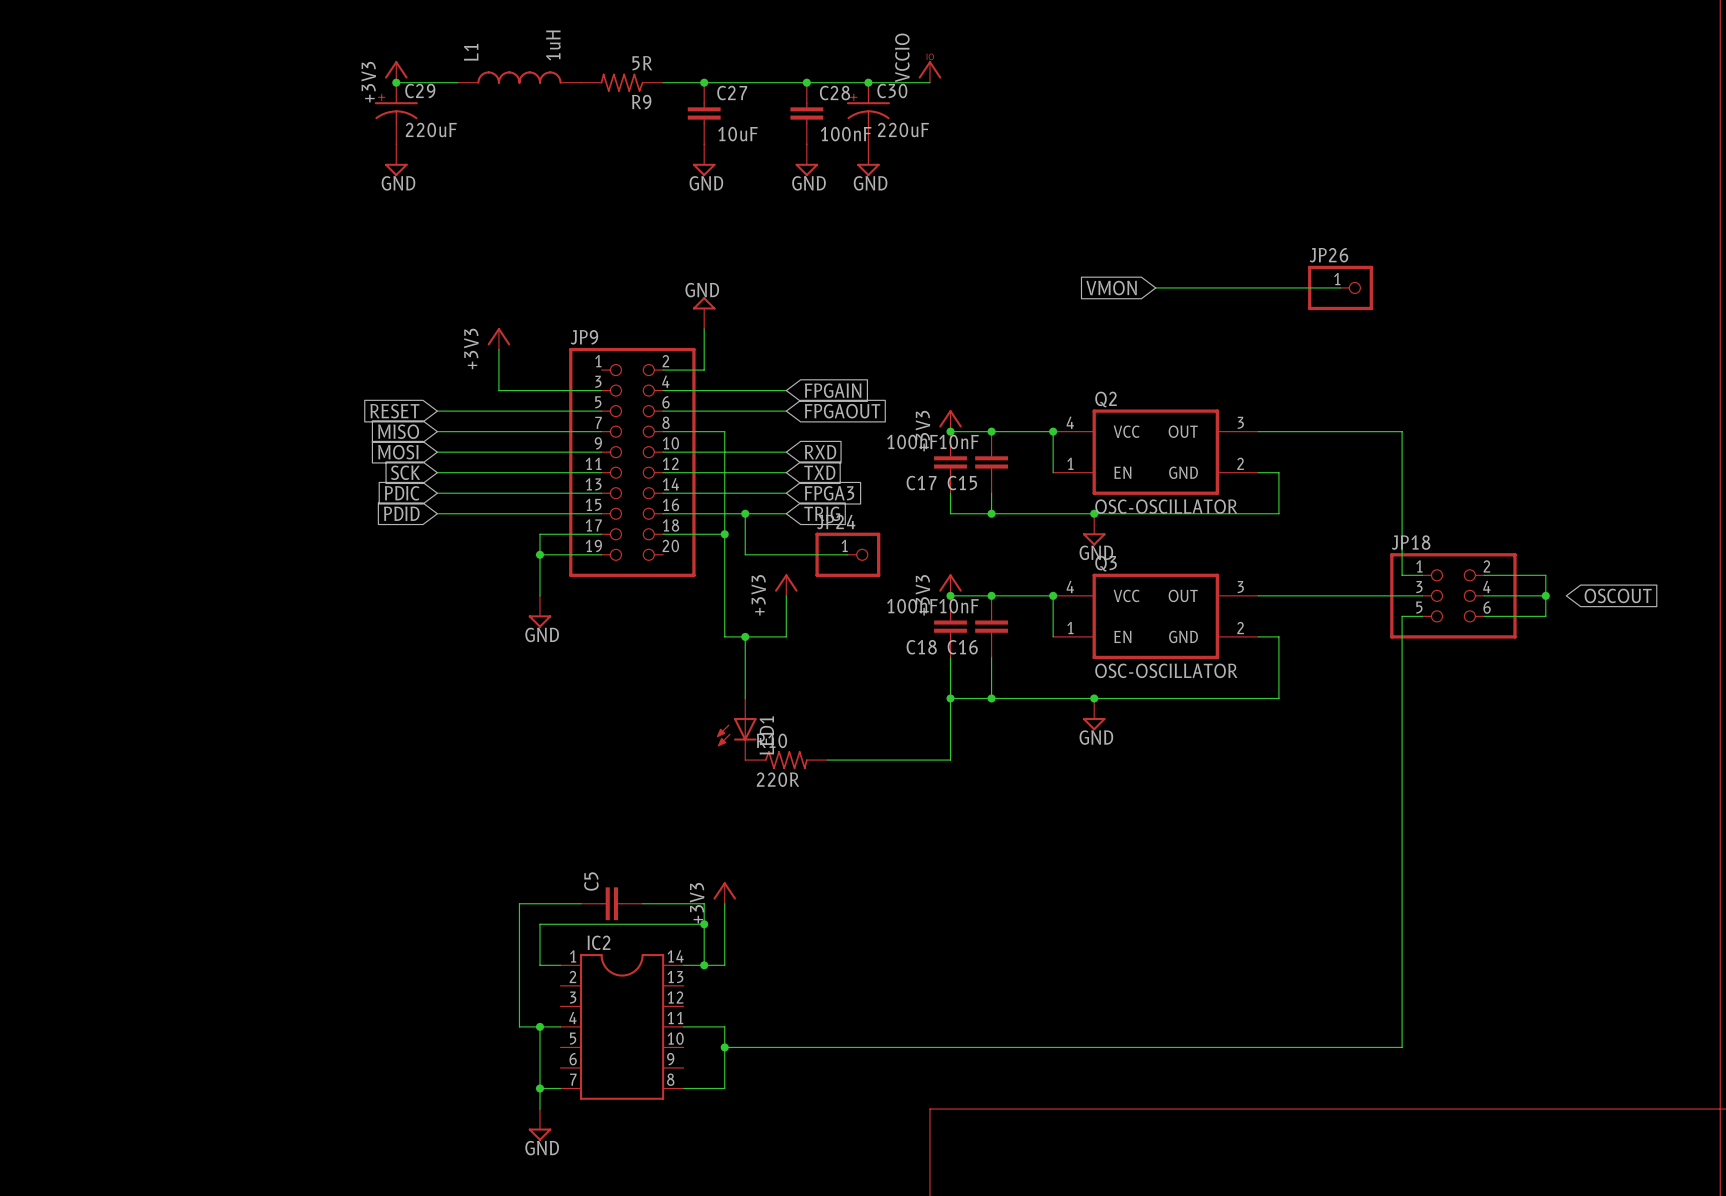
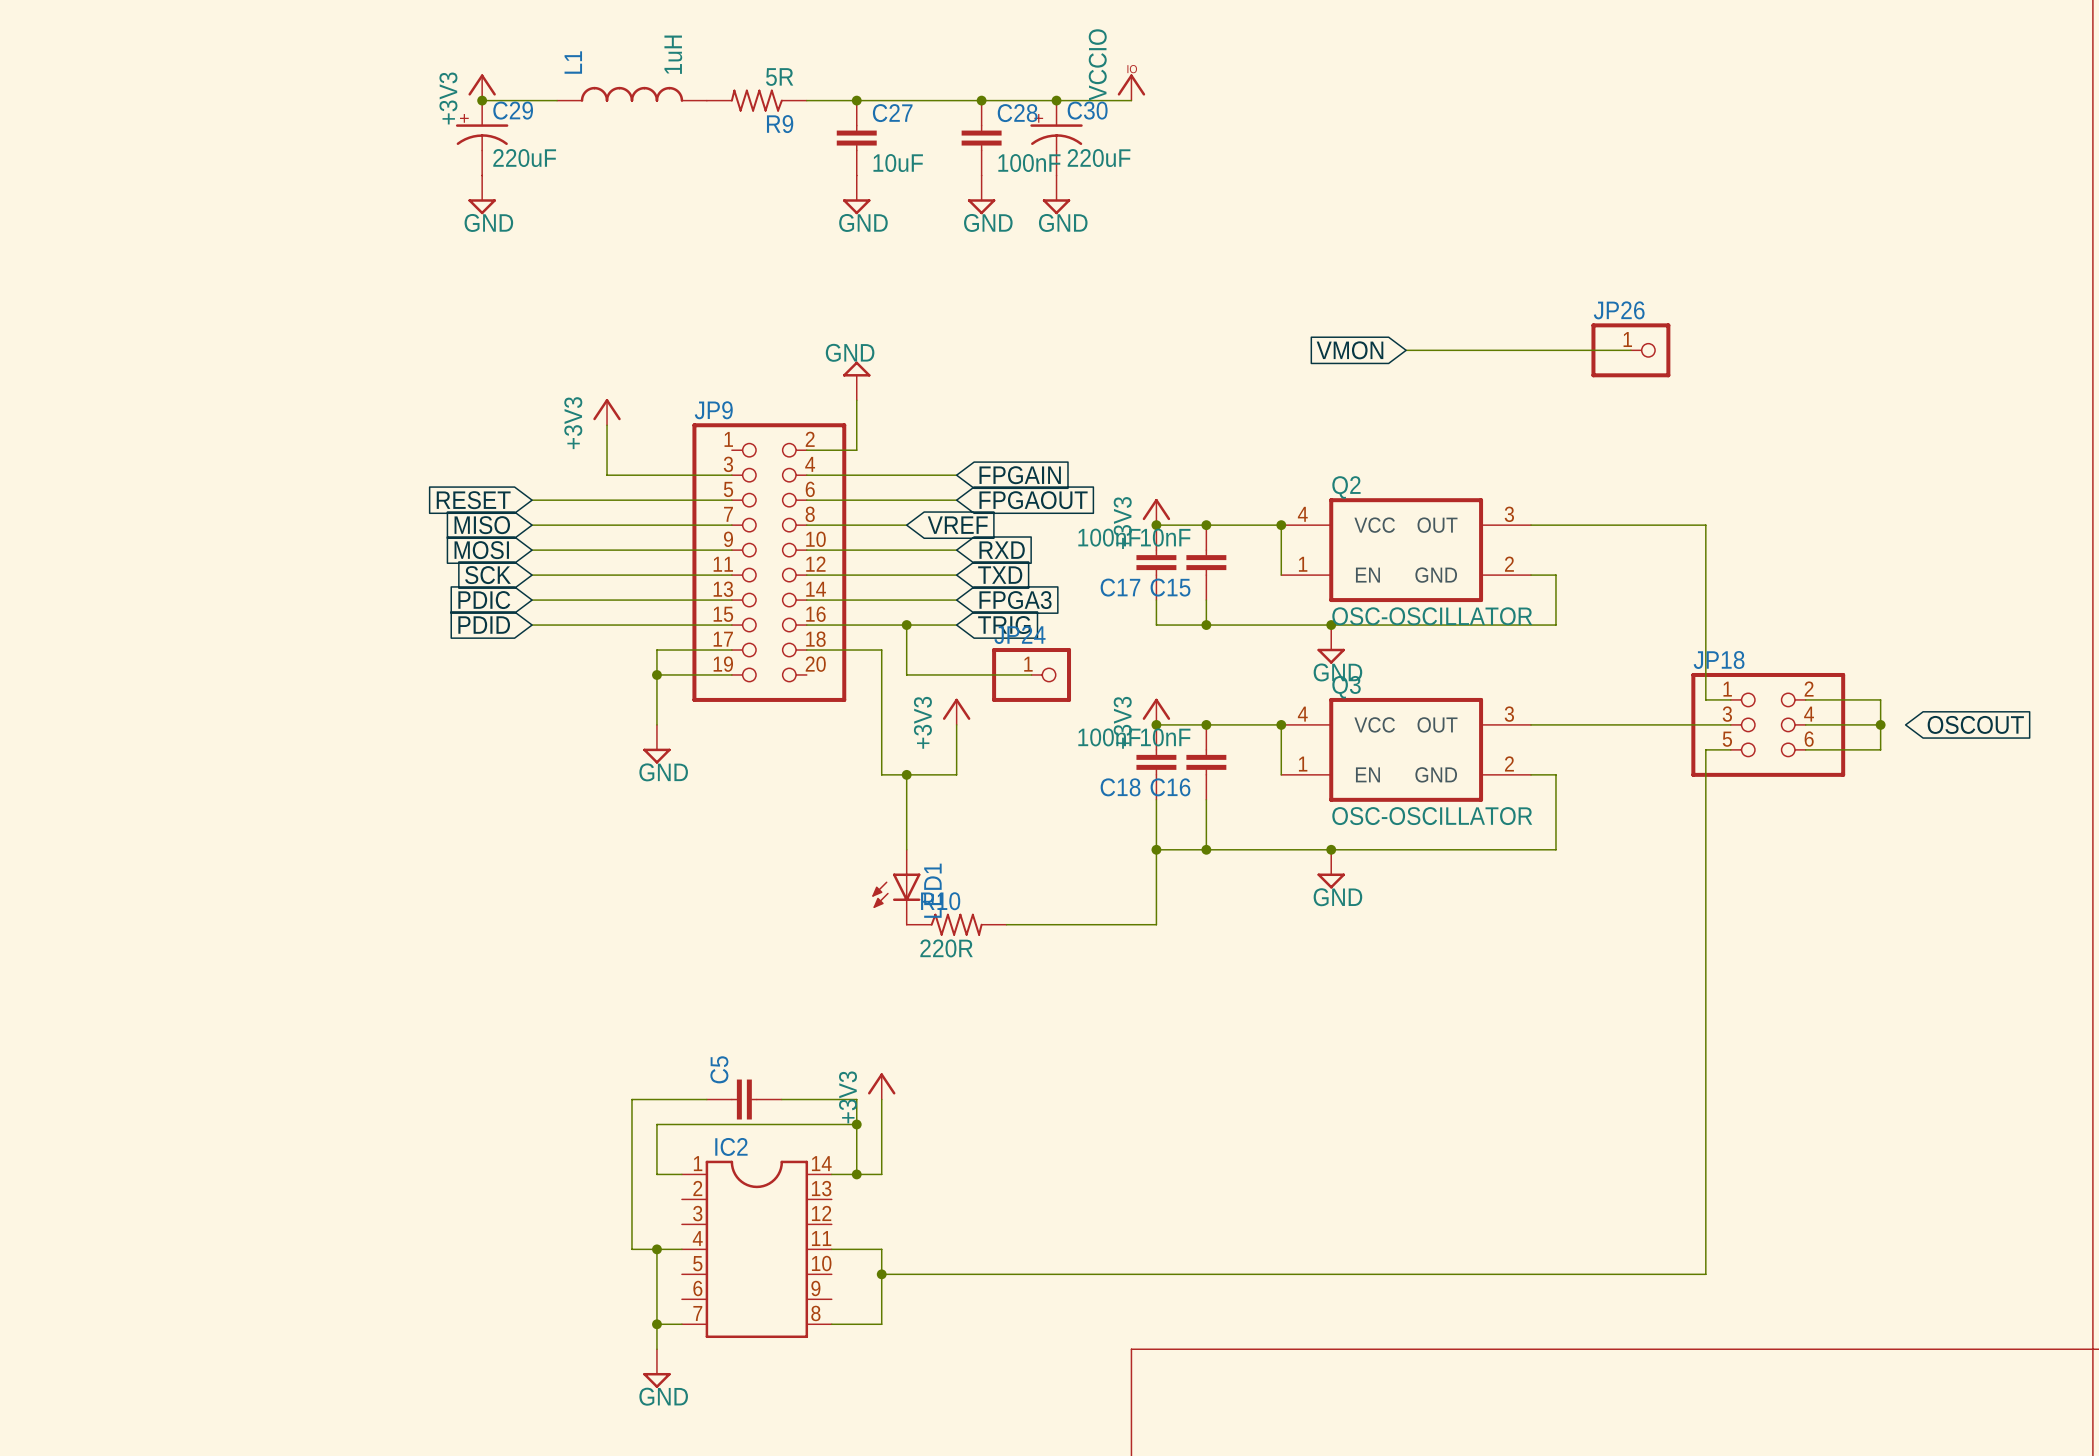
wire: (724, 431) (724, 534) -> (881, 525) (906, 525)
global label: none -> VREF (957, 525)
junction: (724, 534) -> none

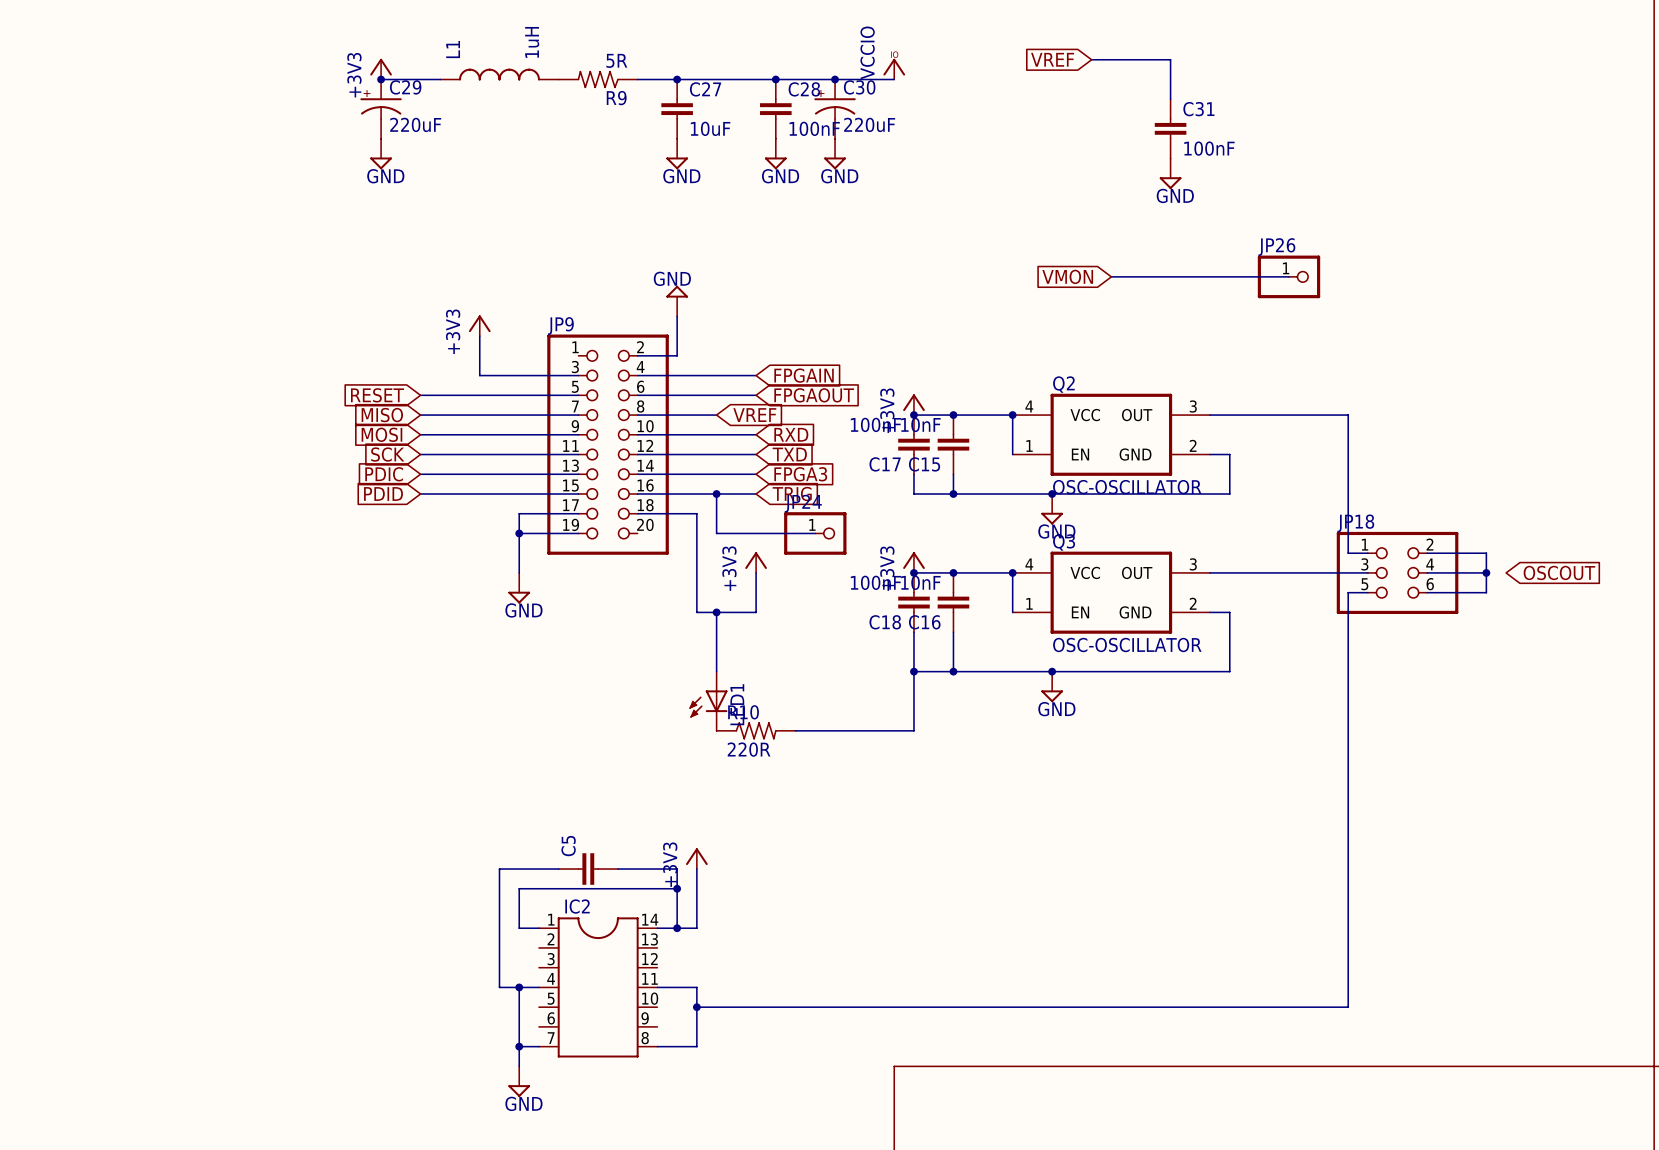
global label: none -> VREF (1052, 59)
wire: none -> (1091, 59) (1170, 59) (1170, 99)
C31: none -> 100nF (1170, 128)
power symbol: none -> GND (1170, 173)

